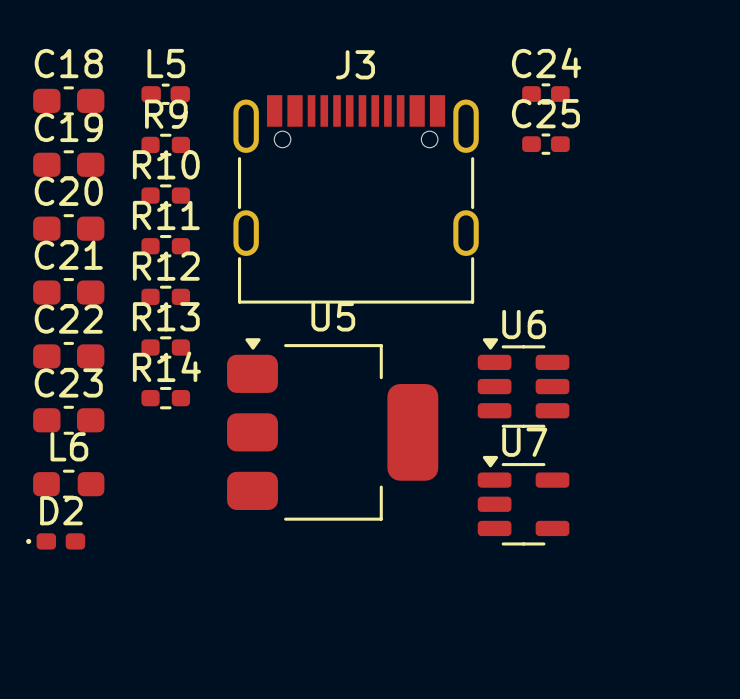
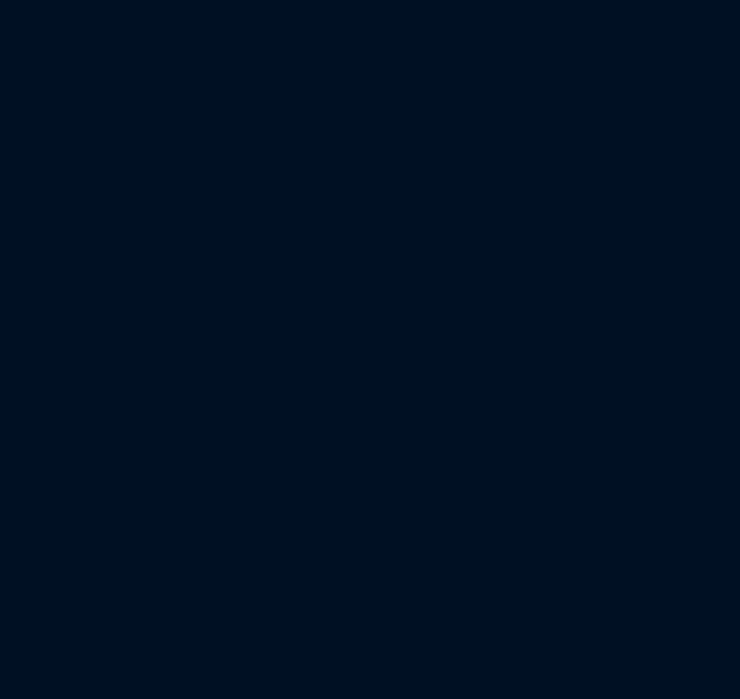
L5: (165, 94) -> none
C24: (545, 94) -> none
C18: (68, 100) -> none
R9: (165, 144) -> none
C25: (545, 144) -> none
C19: (68, 164) -> none
R10: (165, 195) -> none
J3: (356, 199) -> none
C20: (68, 228) -> none
R11: (165, 246) -> none
C21: (68, 292) -> none
R12: (165, 296) -> none
R13: (165, 347) -> none
C22: (68, 356) -> none
U6: (523, 383) -> none
R14: (165, 398) -> none
C23: (68, 420) -> none
U5: (332, 429) -> none
L6: (68, 484) -> none
U7: (523, 500) -> none
D2: (55, 541) -> none

